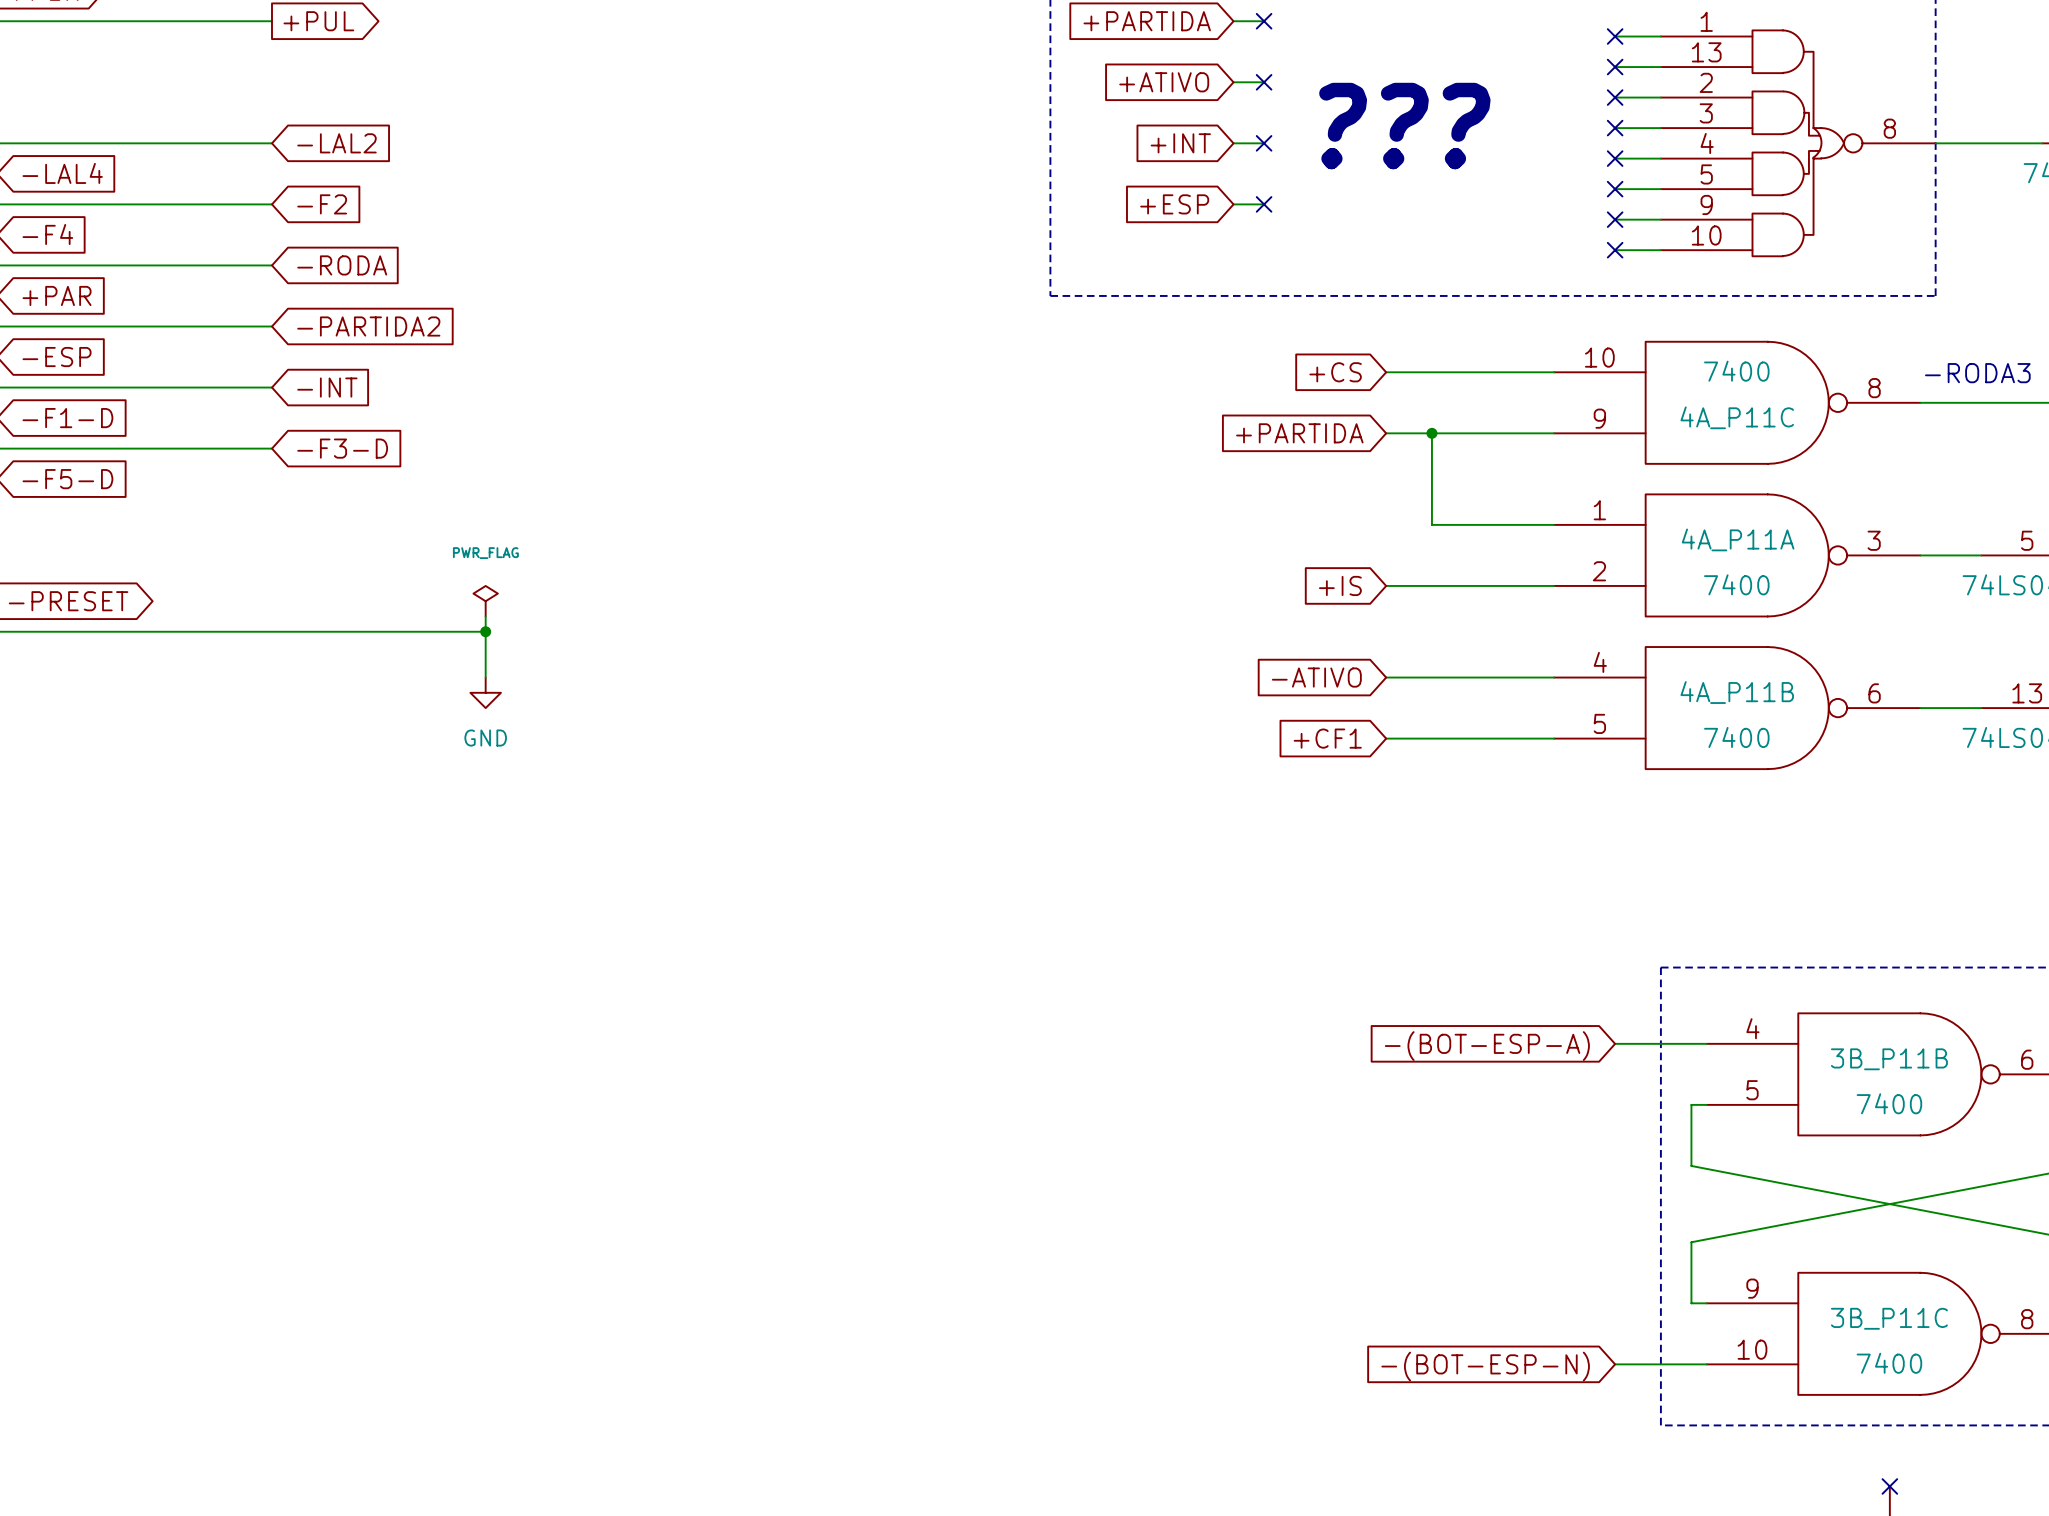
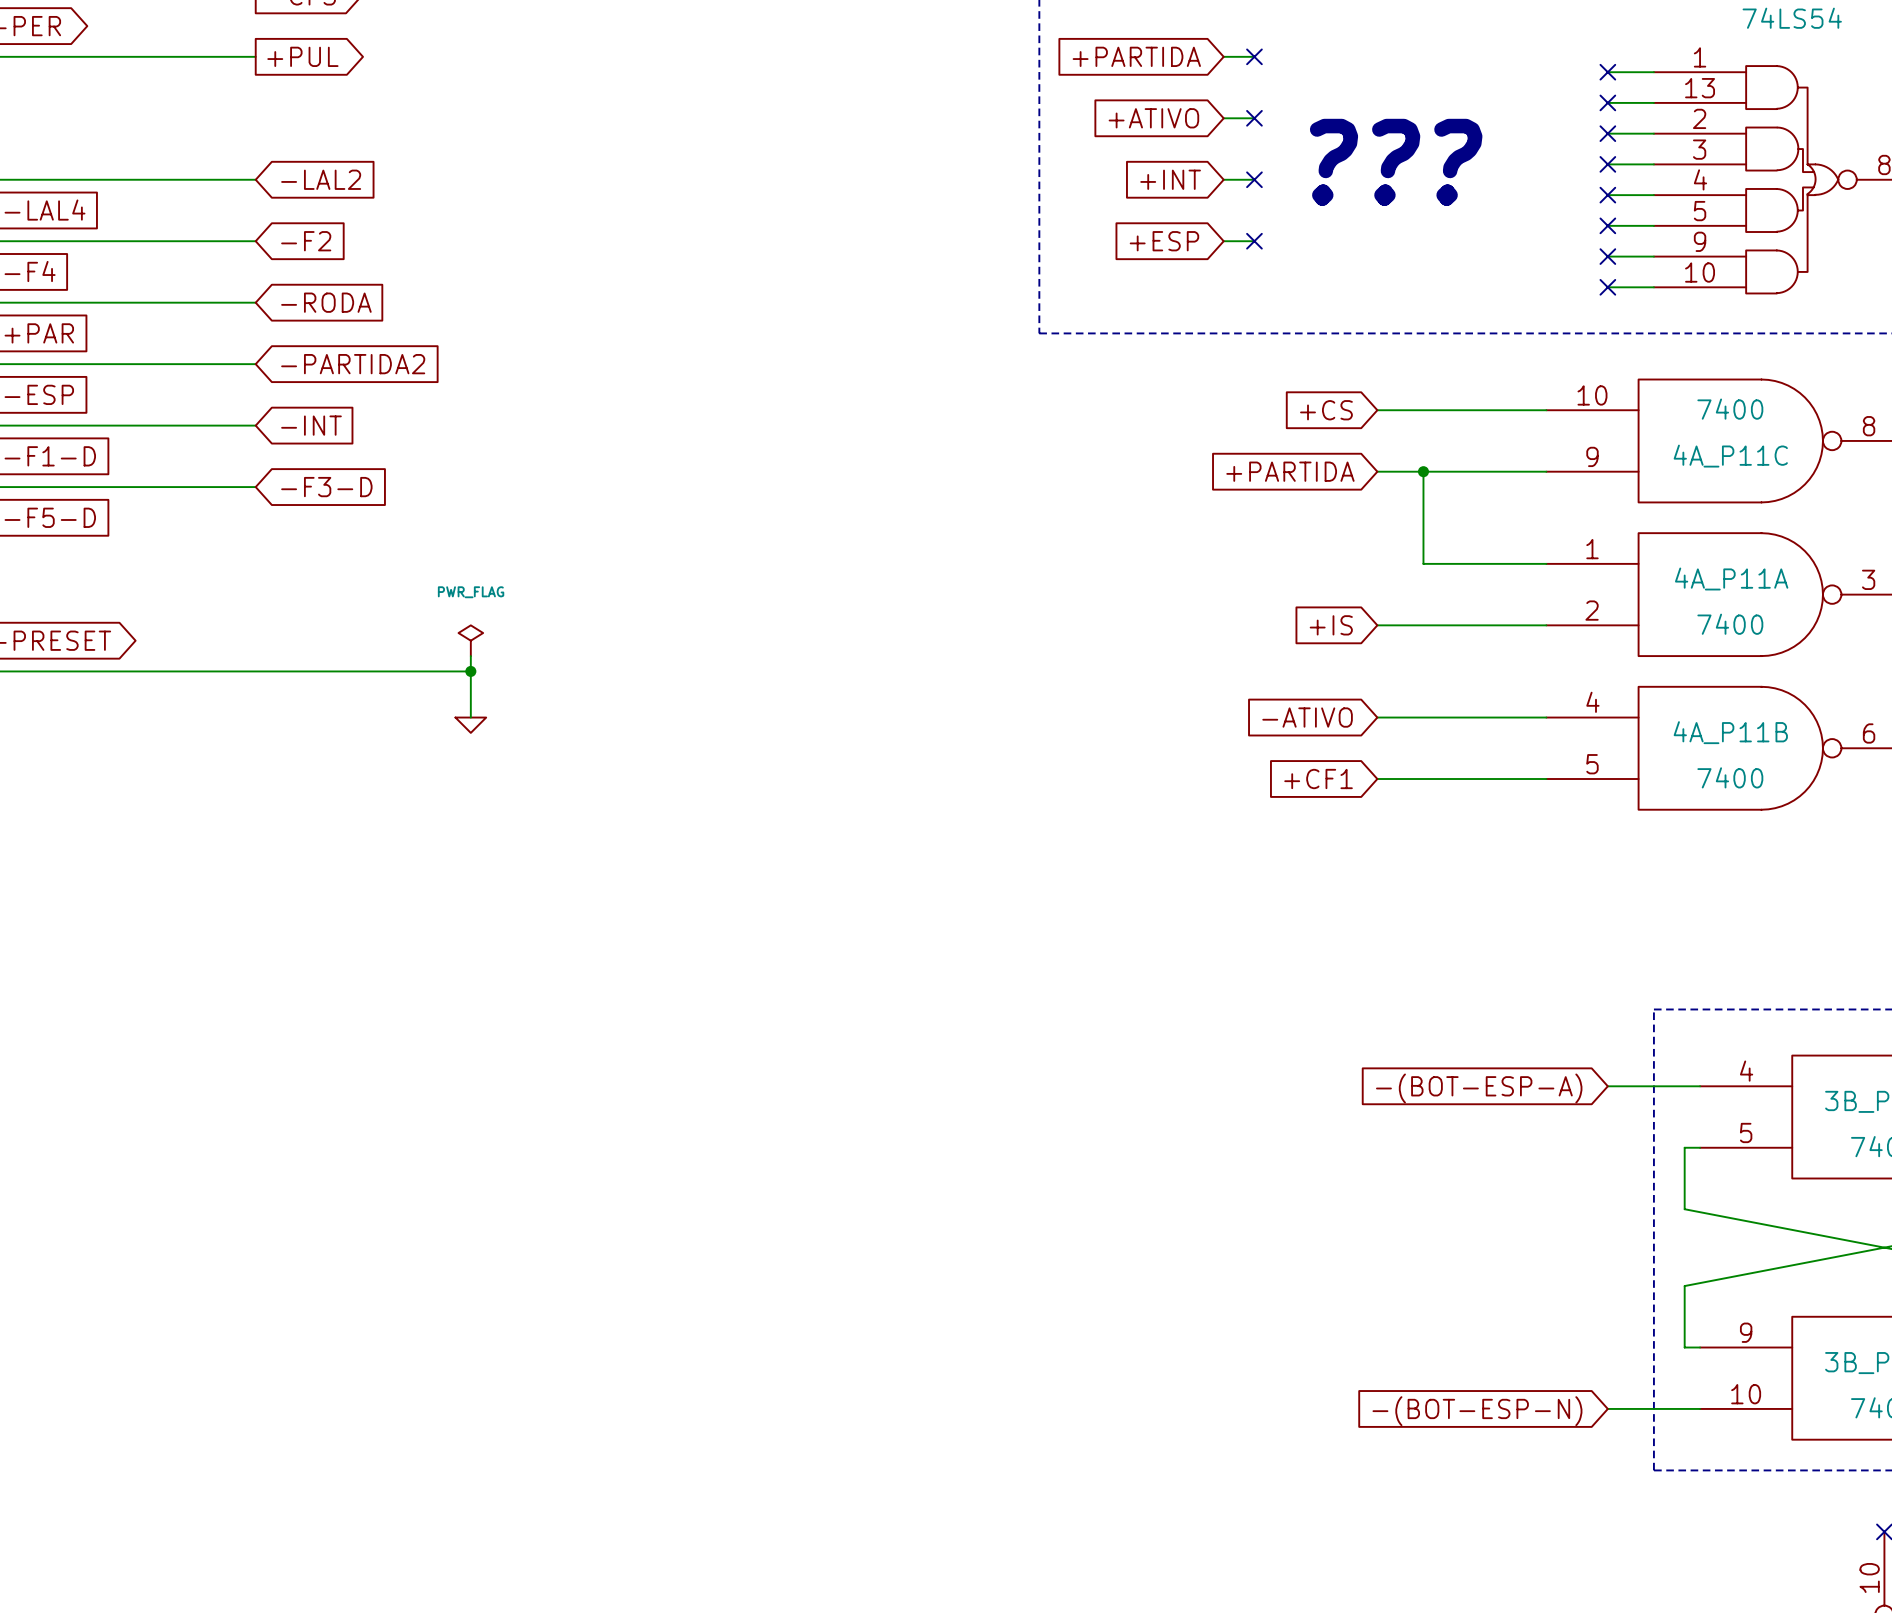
power symbol shape: [470, 677, 501, 709] -> [455, 717, 487, 733]
power symbol text: GND (485, 738) -> none

